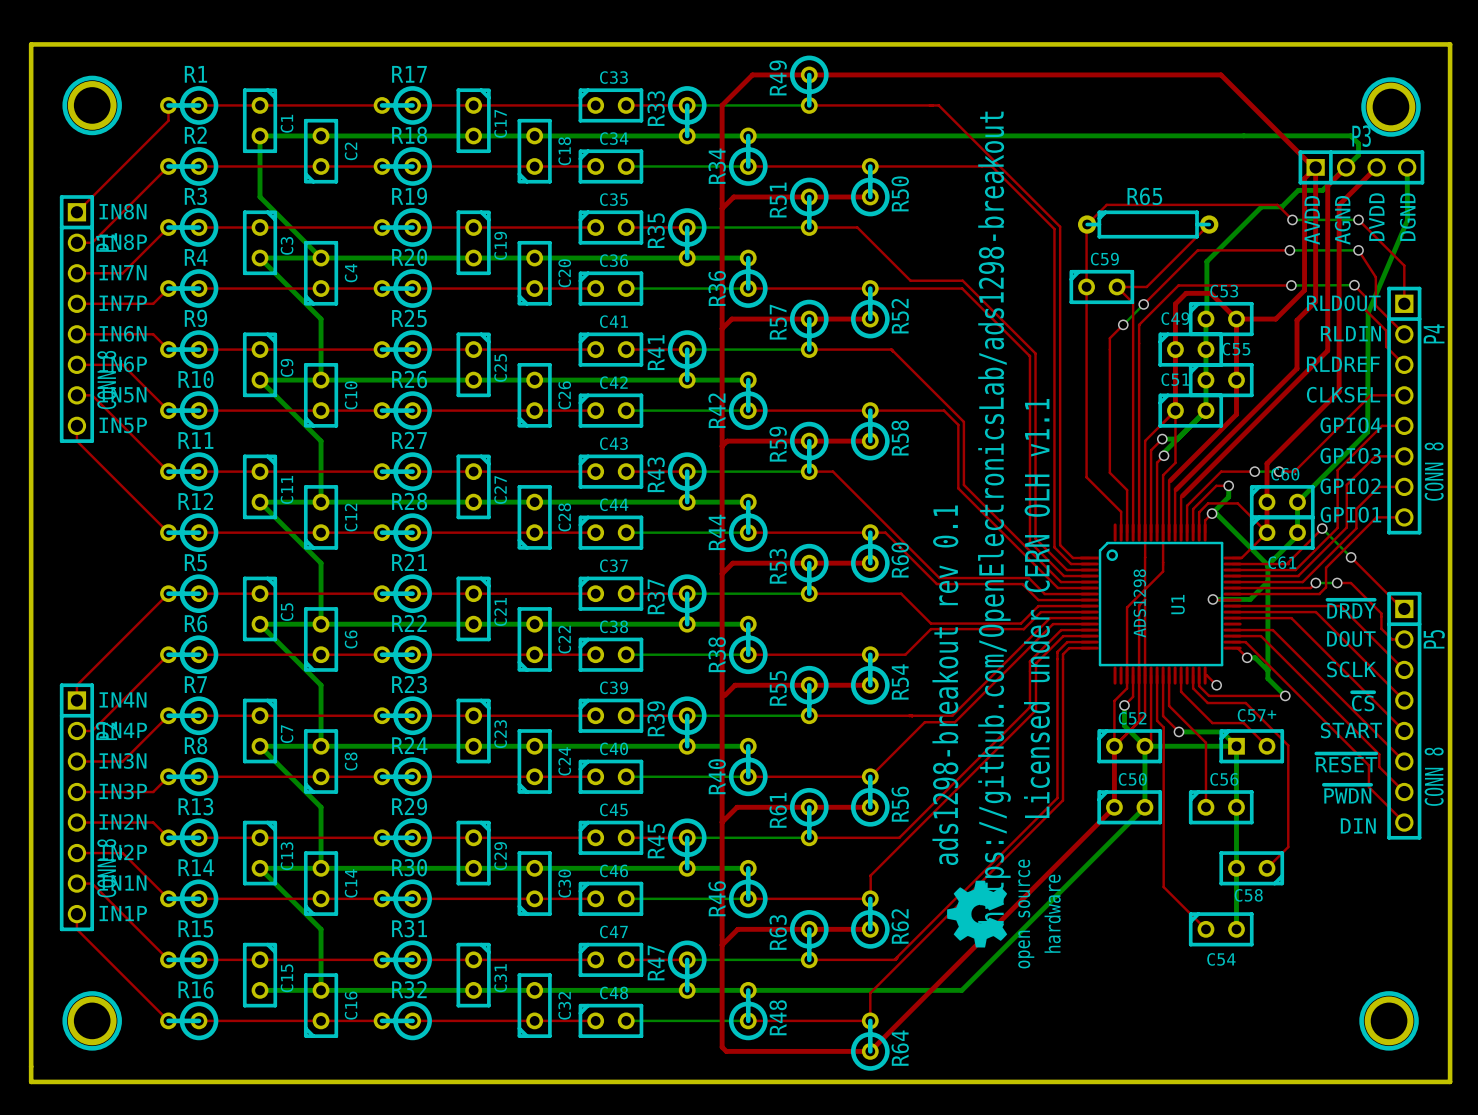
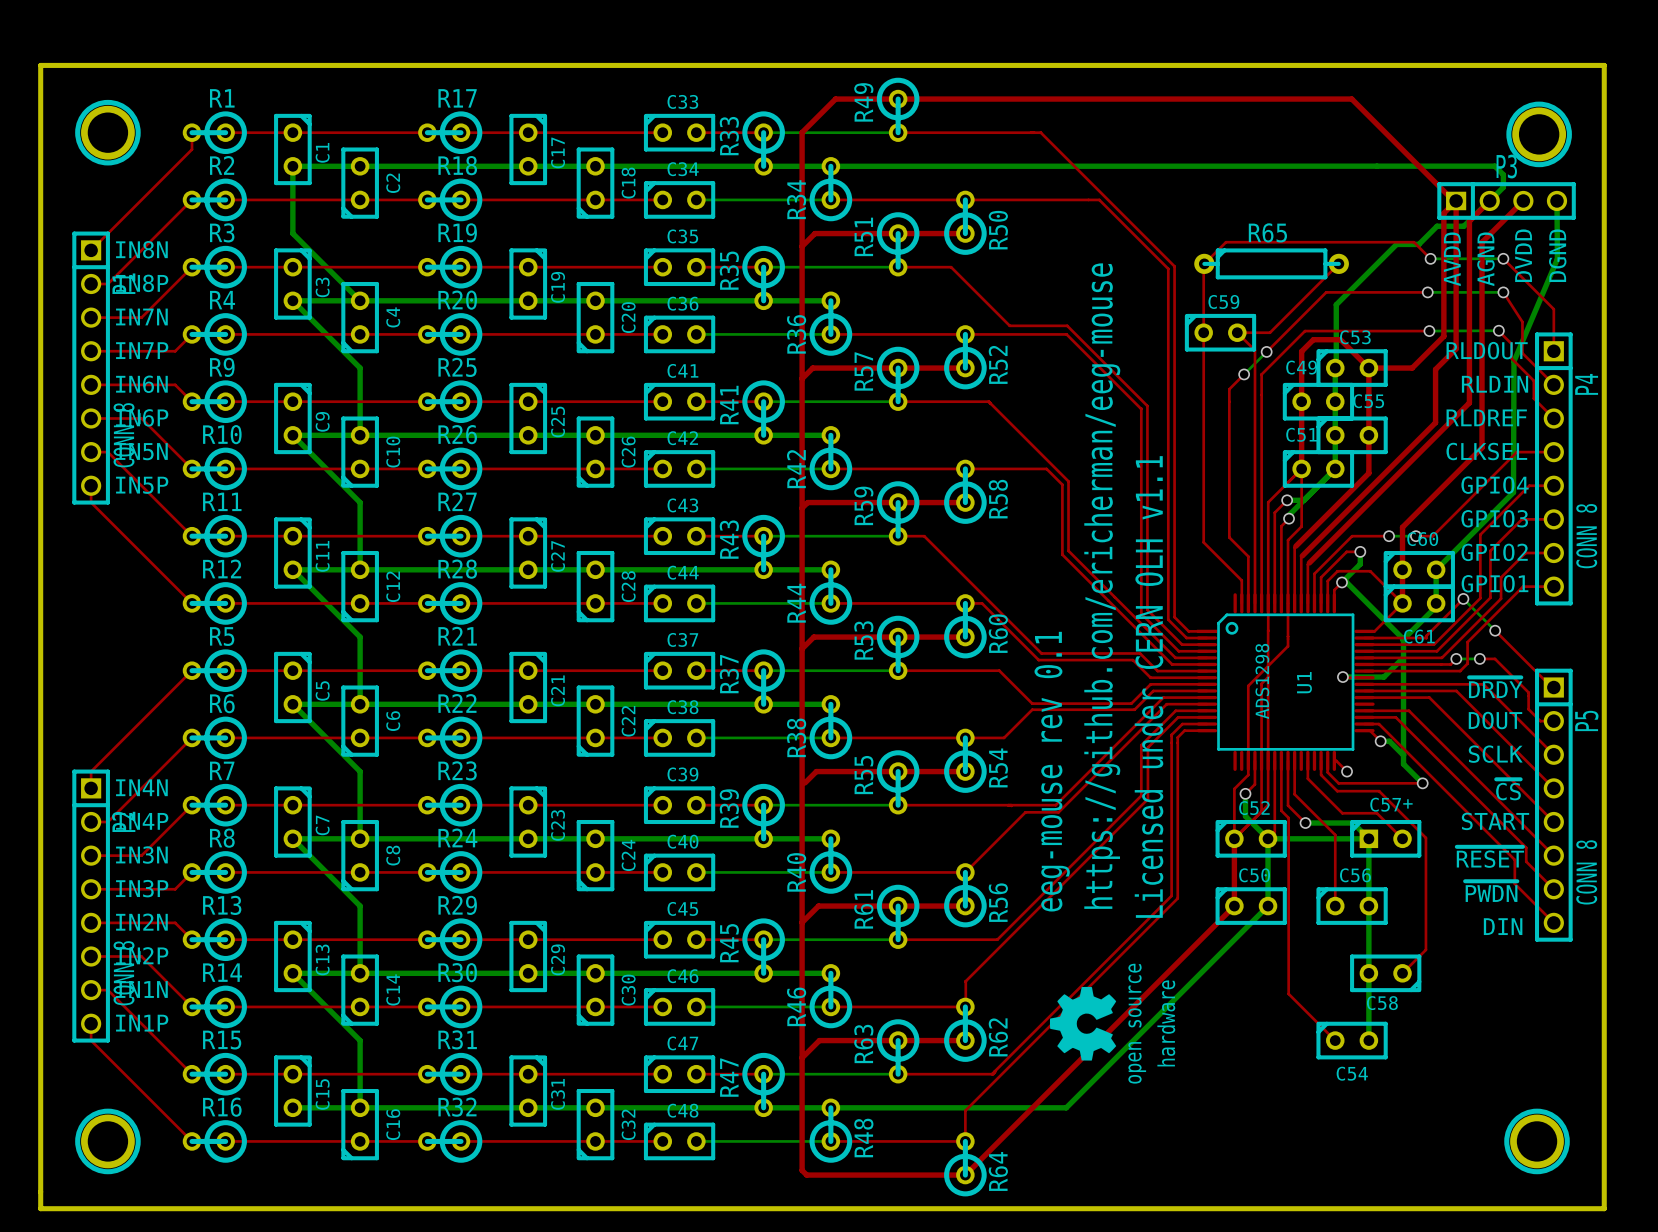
text: https://github.com/OpenElectronicsLab/ads1298-breakout (994, 517) -> https://github.com/ericherman/eeg-mouse (1102, 586)
text: ads1298-breakout rev 0.1 (945, 685) -> eeg-mouse rev 0.1 (1052, 771)

